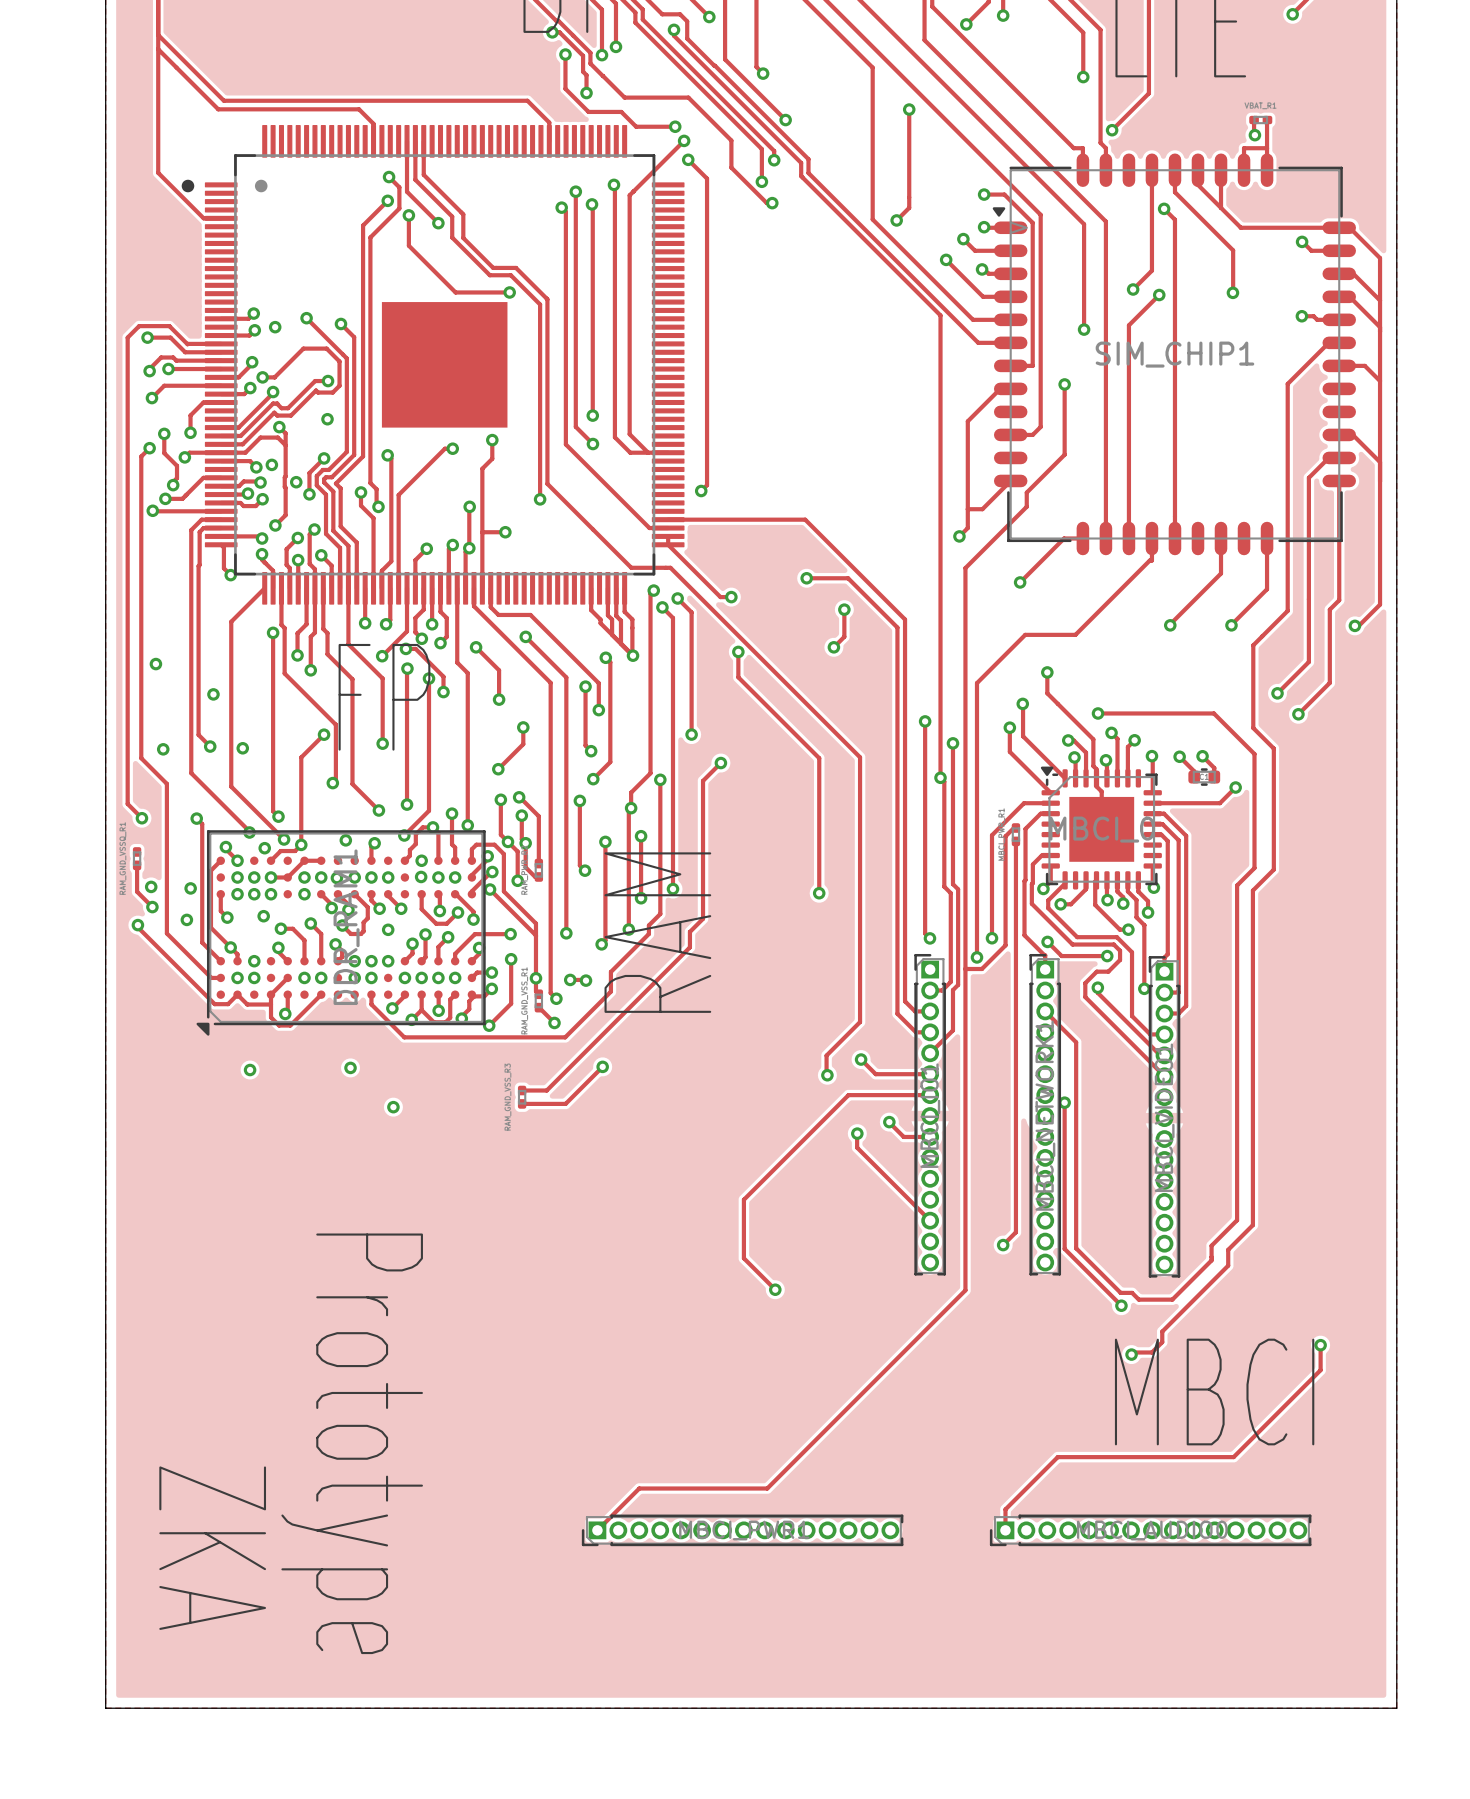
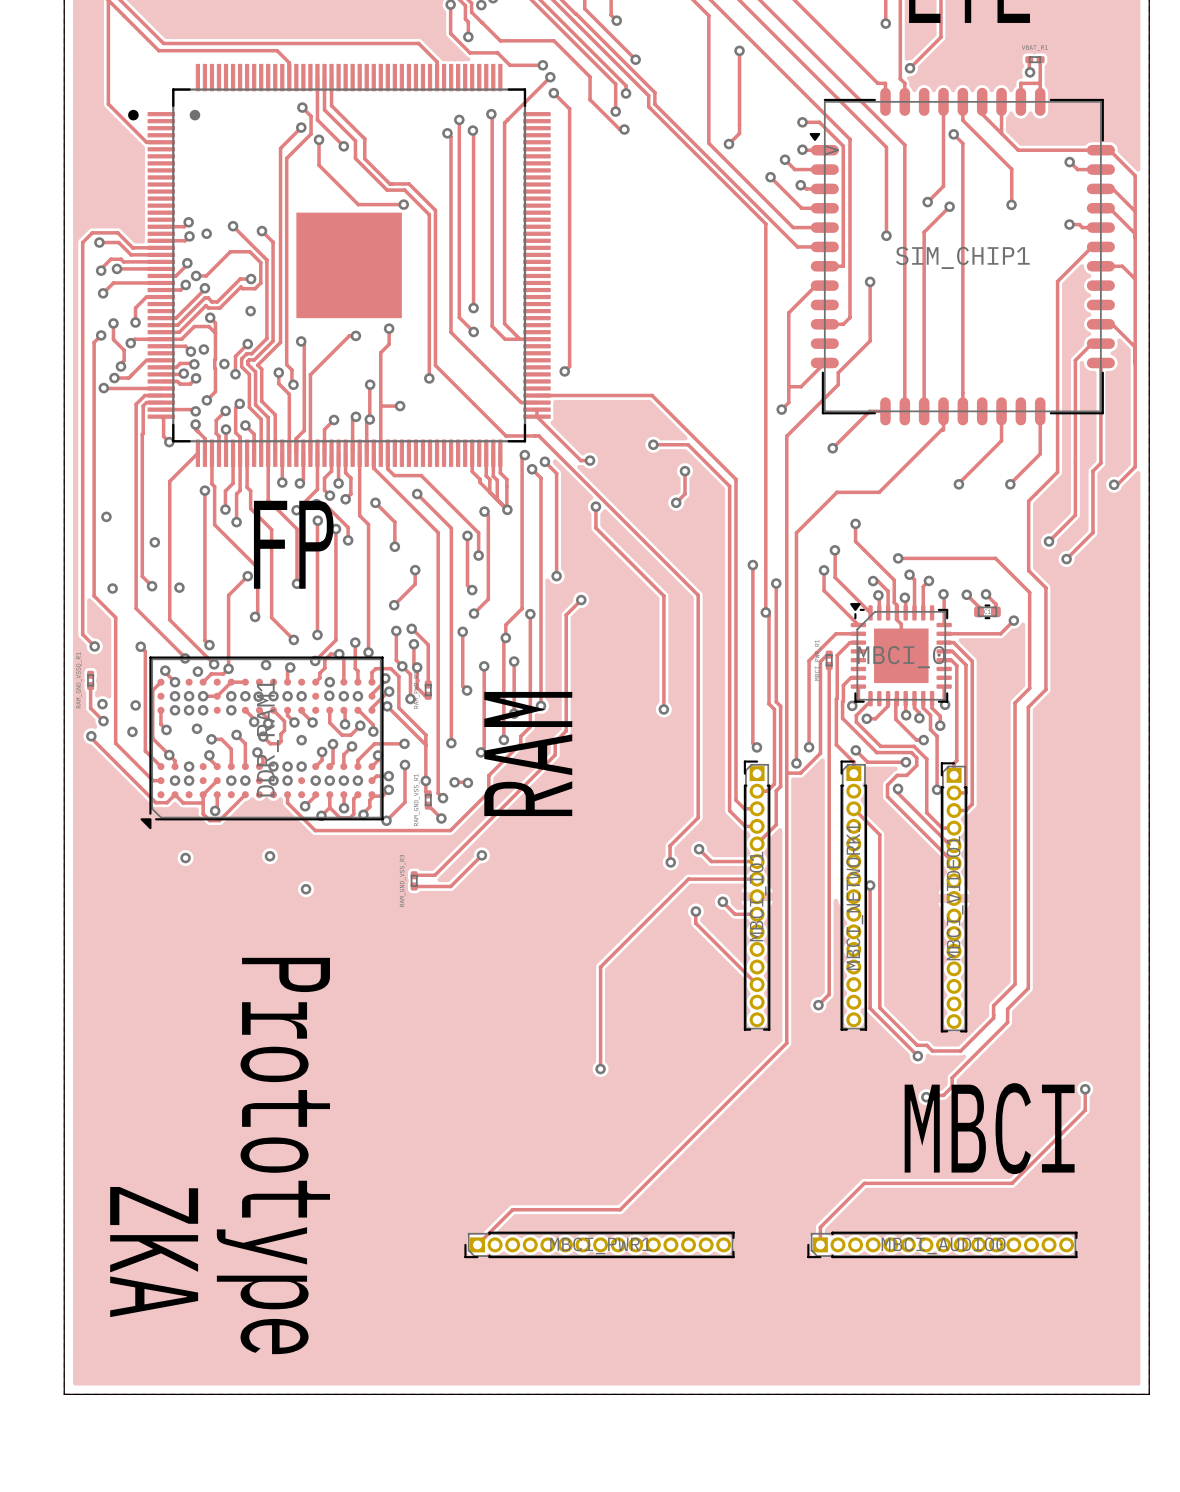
track: (743, 1258) (775, 1289) -> (600, 1016) (600, 1069)
via position: (775, 1289) -> (600, 1069)

